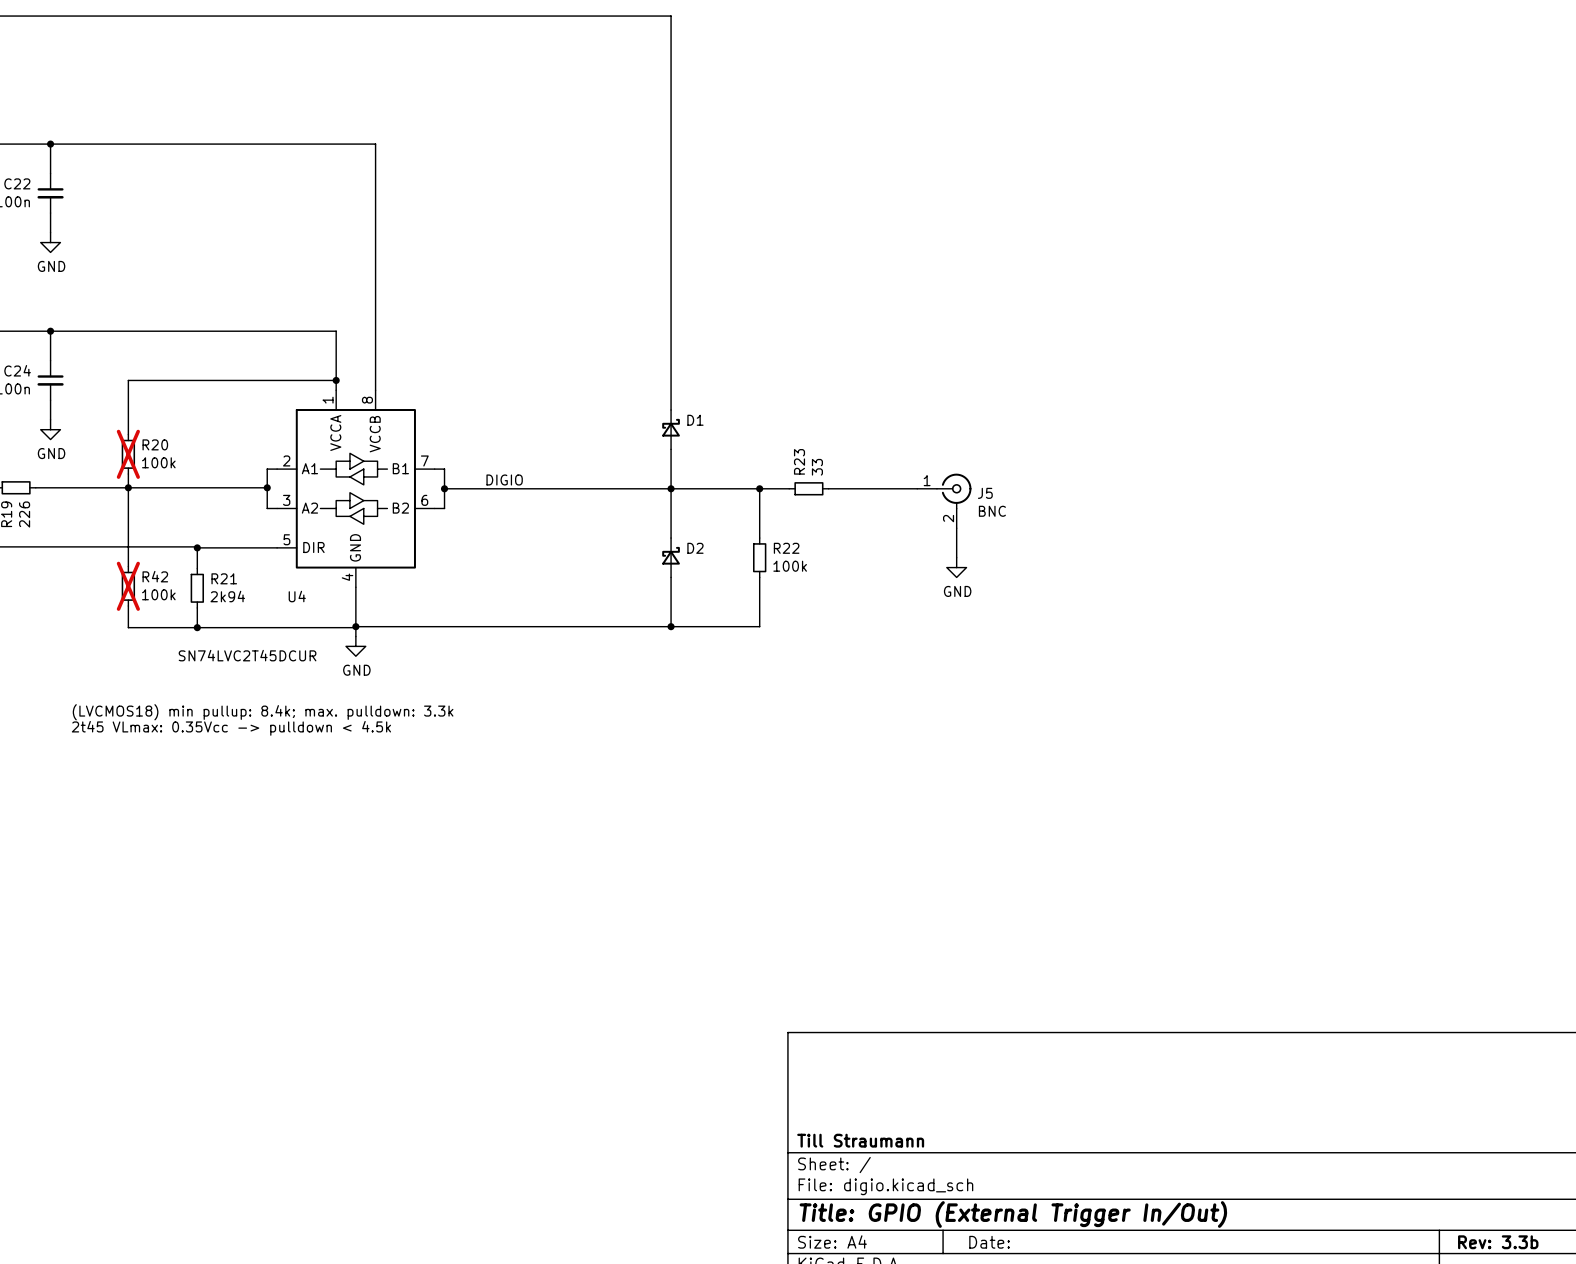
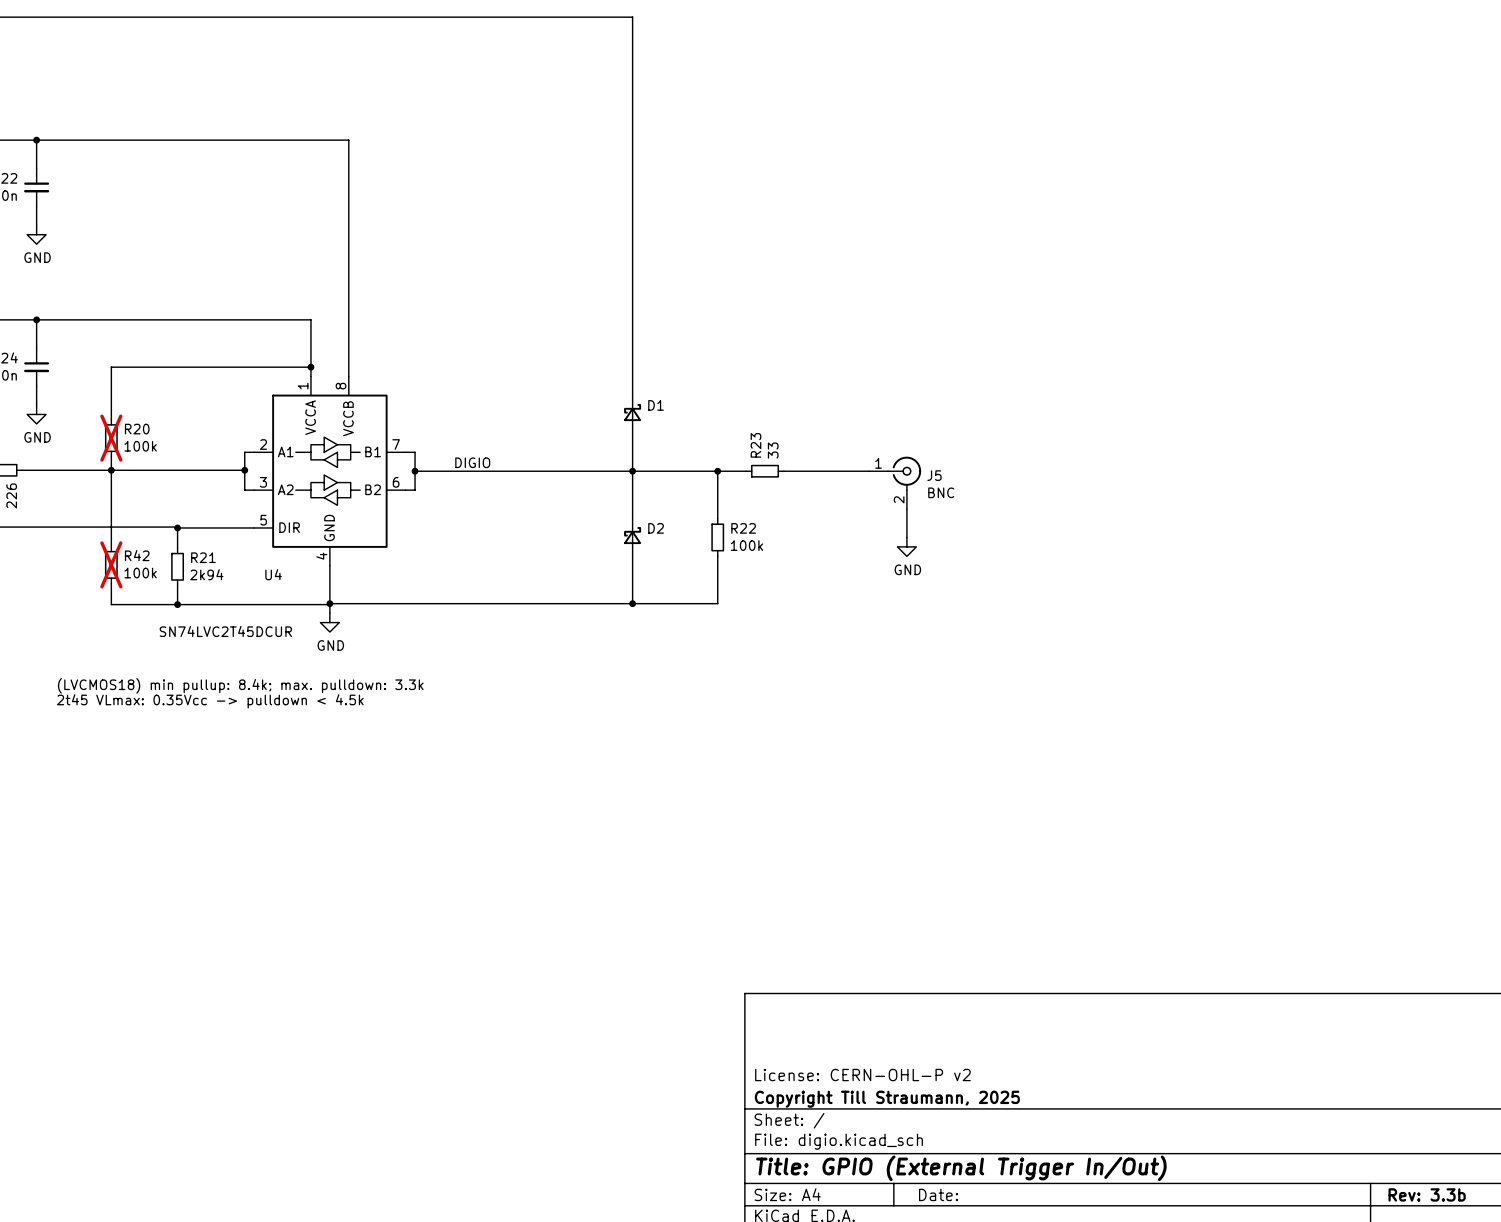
title block: none -> License: CERN-OHL-P v2 (862, 1075)
title block: Till Straumann (860, 1140) -> Copyright Till Straumann, 2025 (887, 1099)

